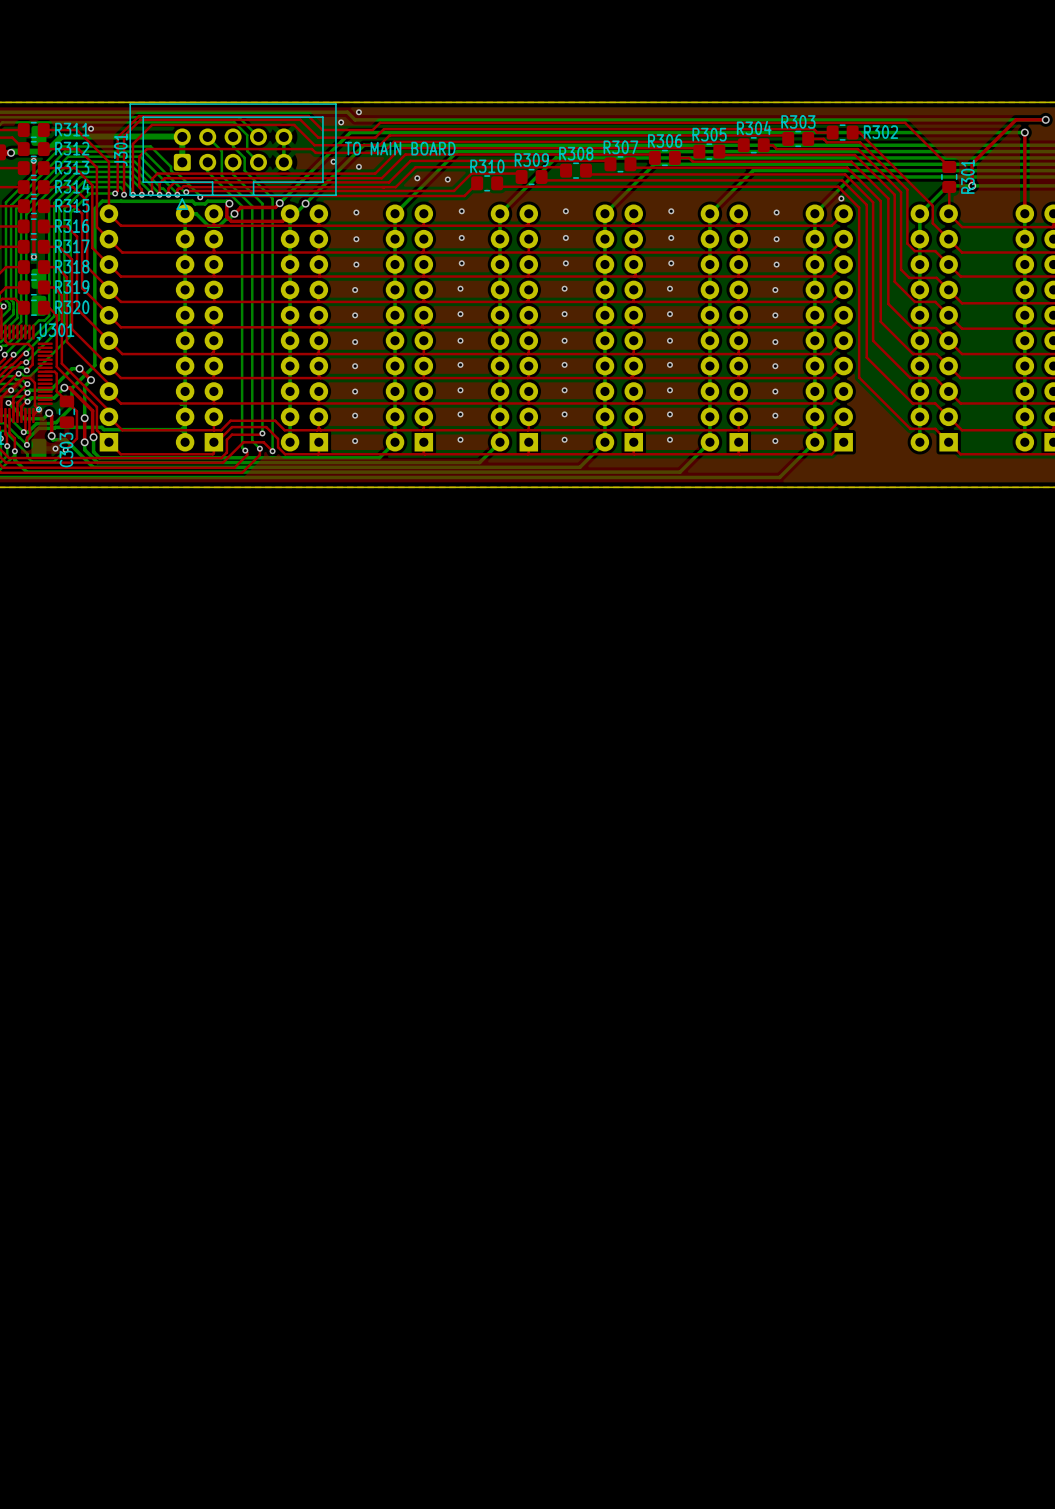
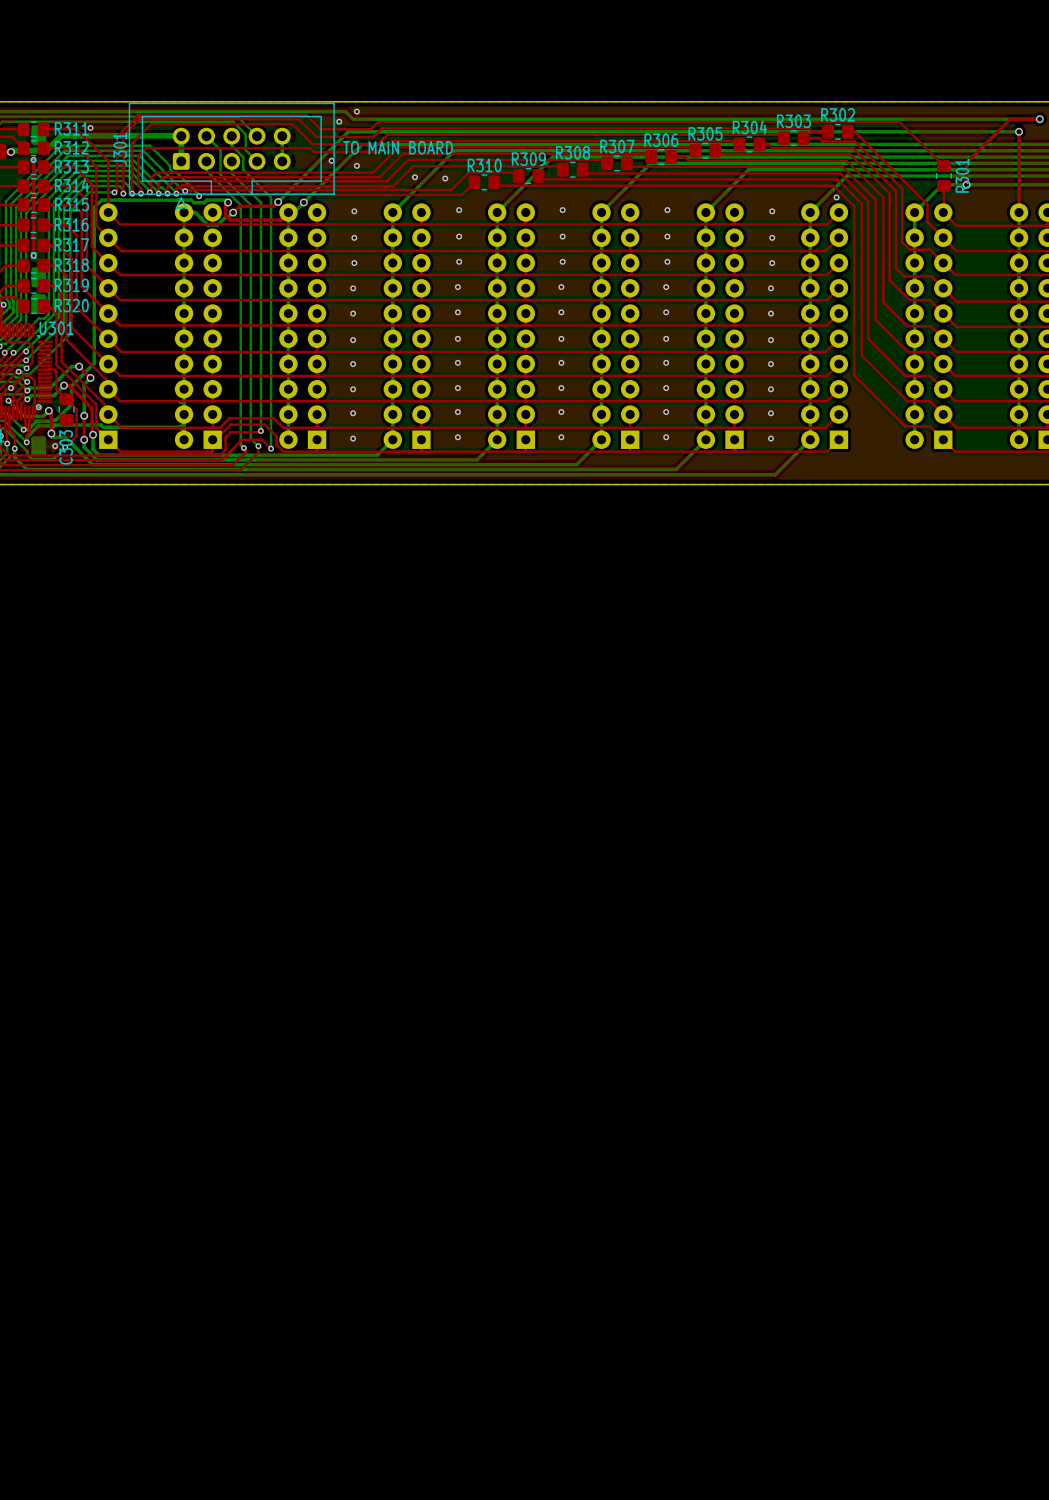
R302 name position: R302 (880, 132) -> R302 (838, 114)

